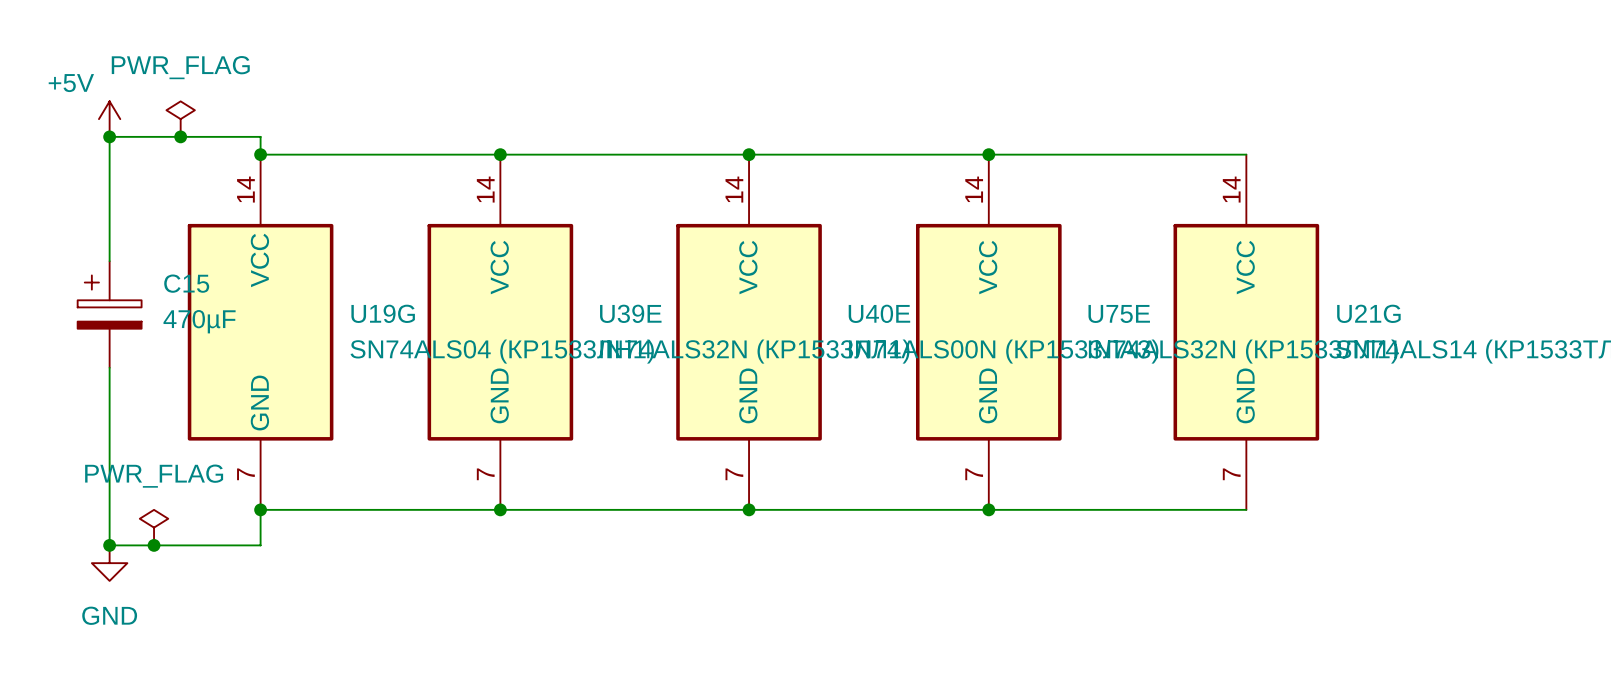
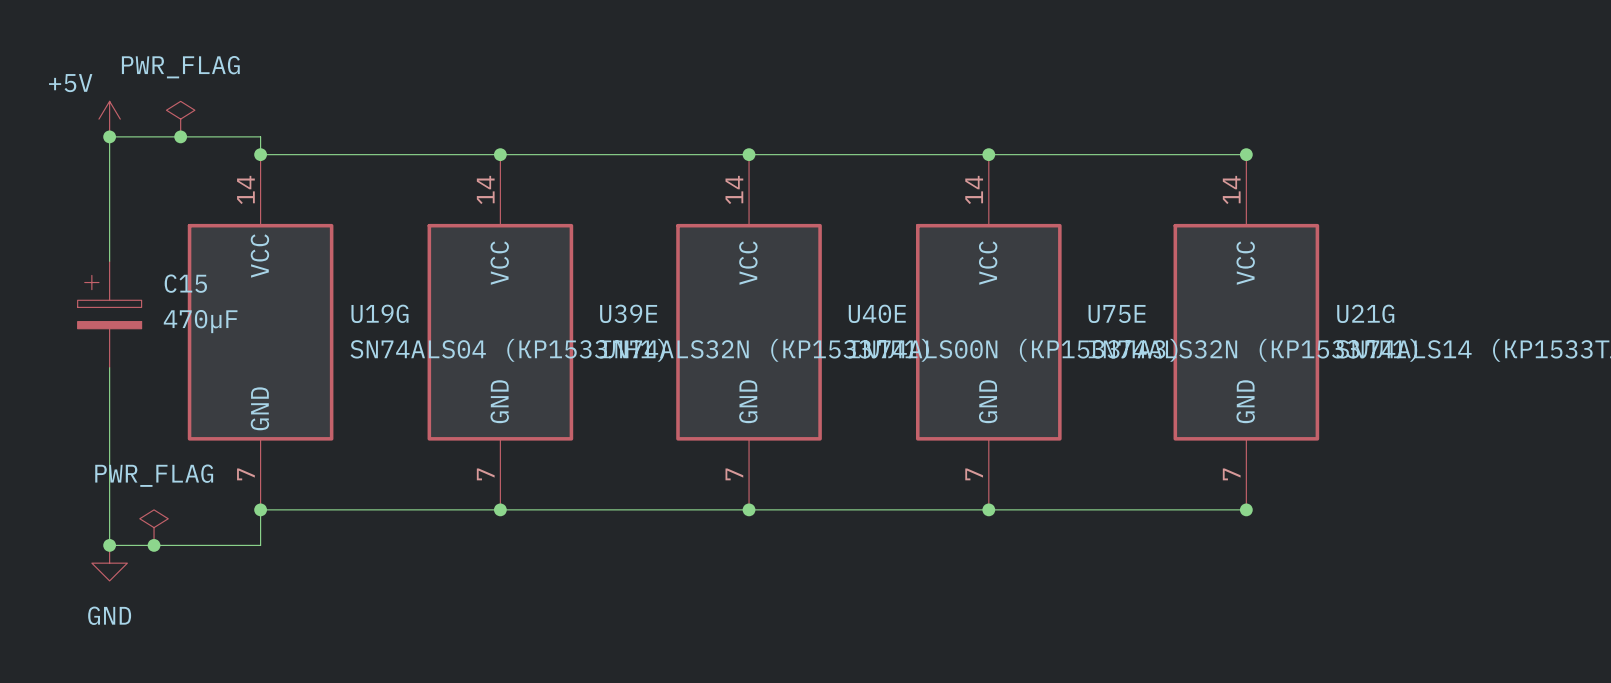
junction: none -> (1246, 154)
junction: none -> (1246, 509)

